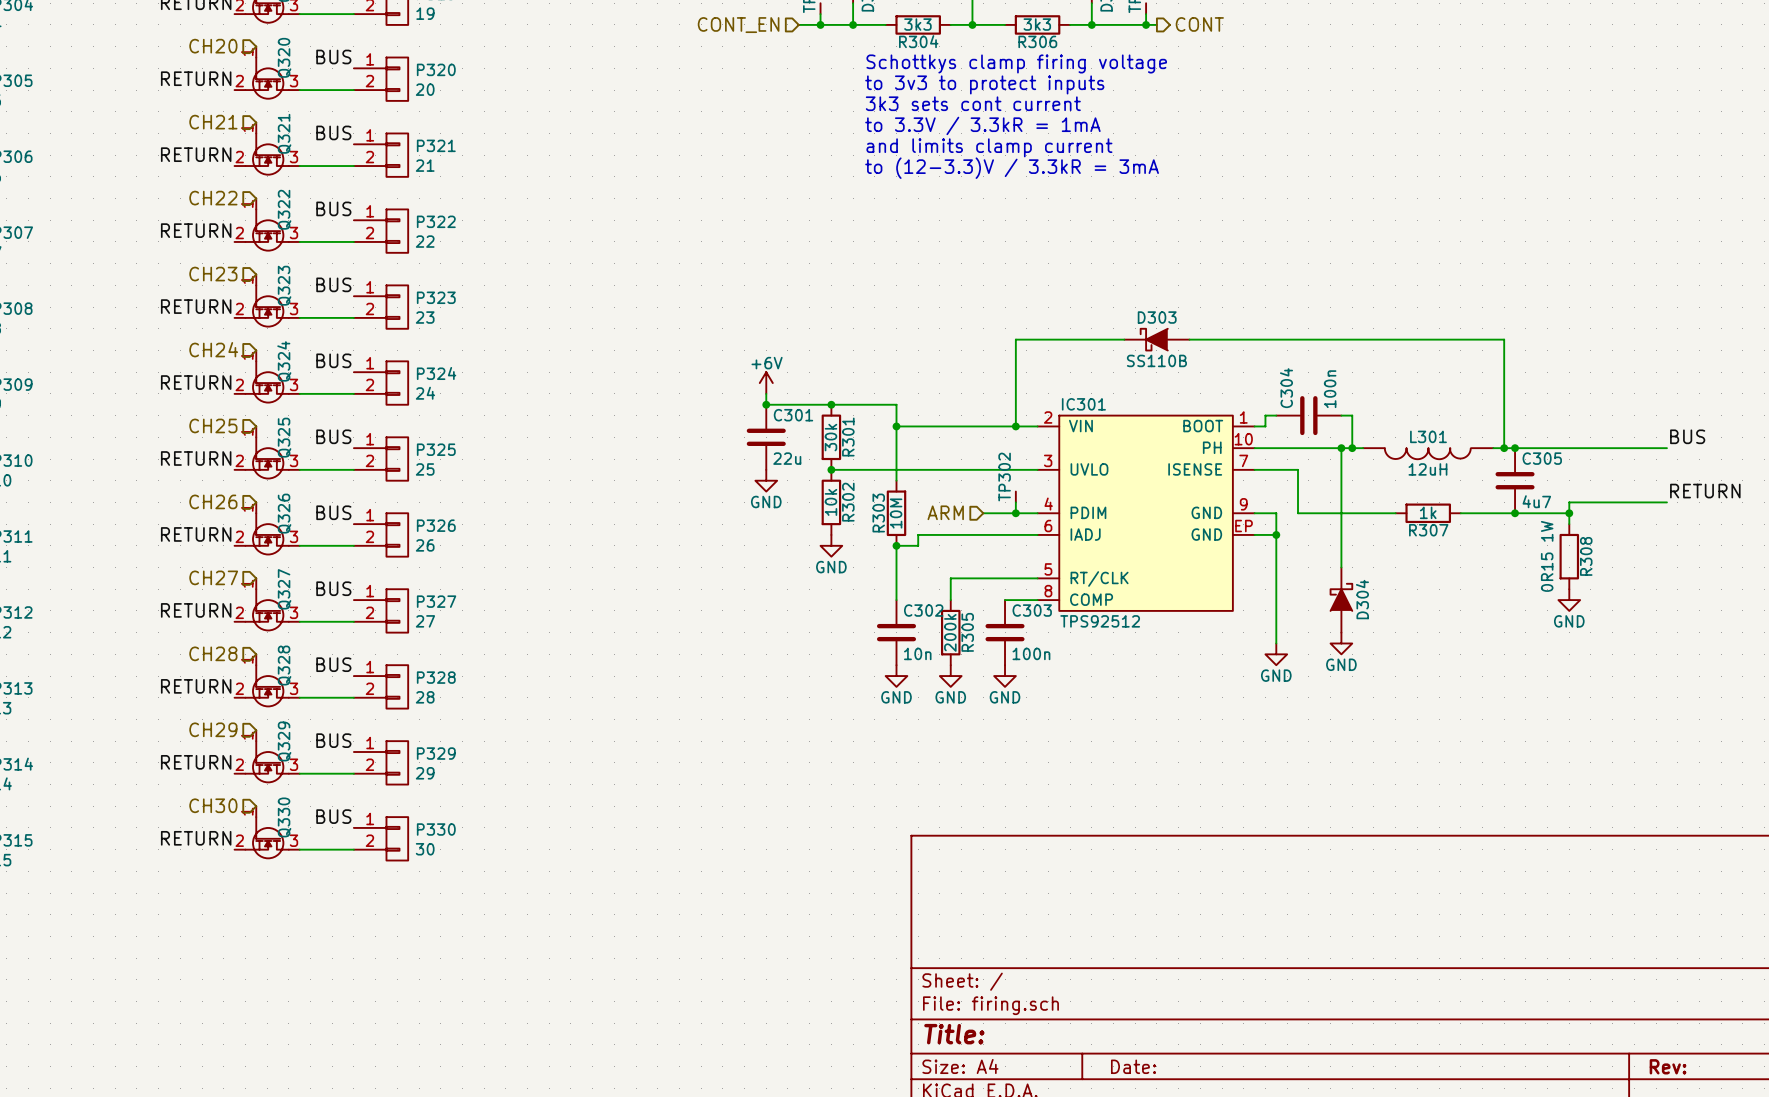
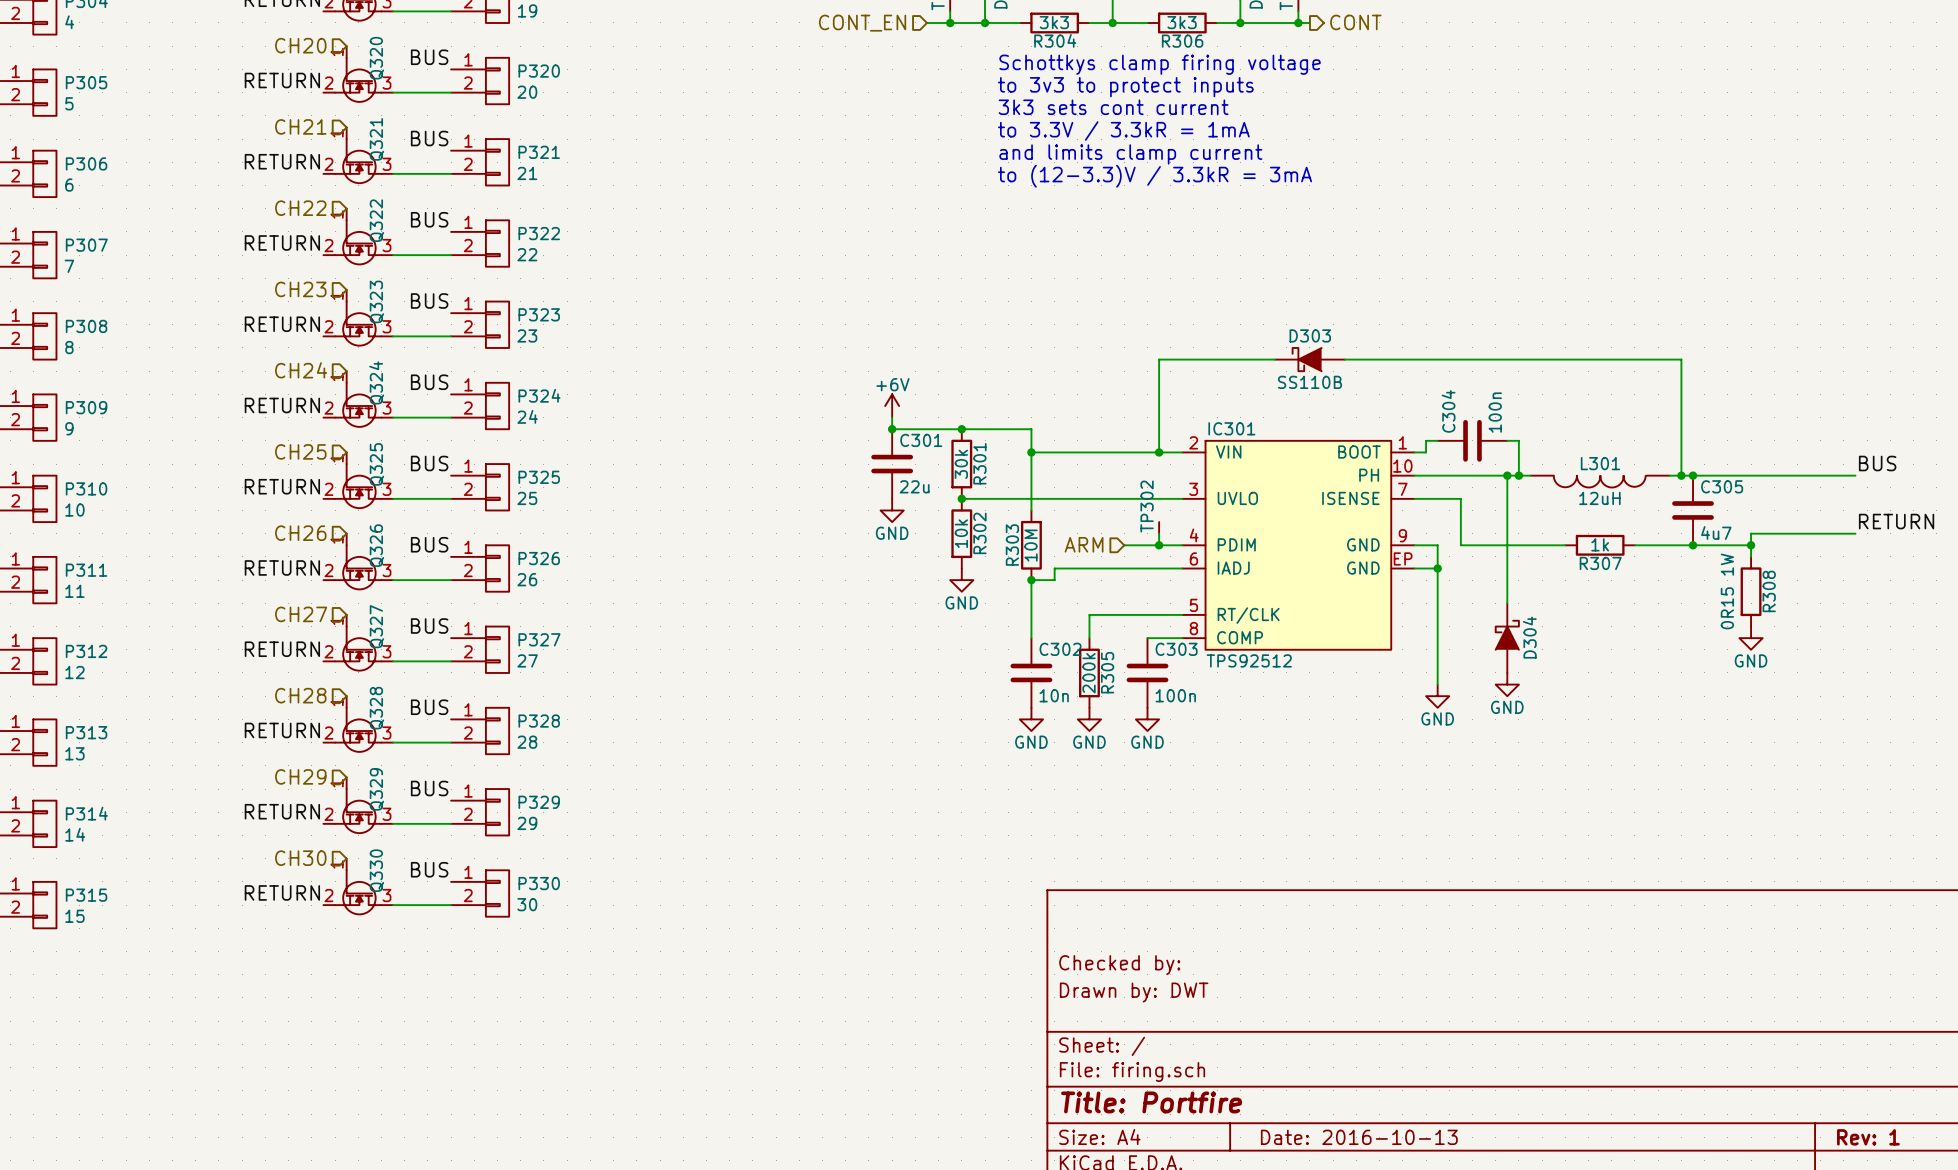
title block: none -> Checked by: (1119, 965)
title block: none -> Drawn by: DWT (1134, 992)
title block: Title: (954, 1034) -> Title: Portfire (1151, 1102)
title block: Date: (1133, 1066) -> Date: 2016-10-13 (1359, 1137)
title block: Rev: (1668, 1066) -> Rev: 1 (1868, 1137)

